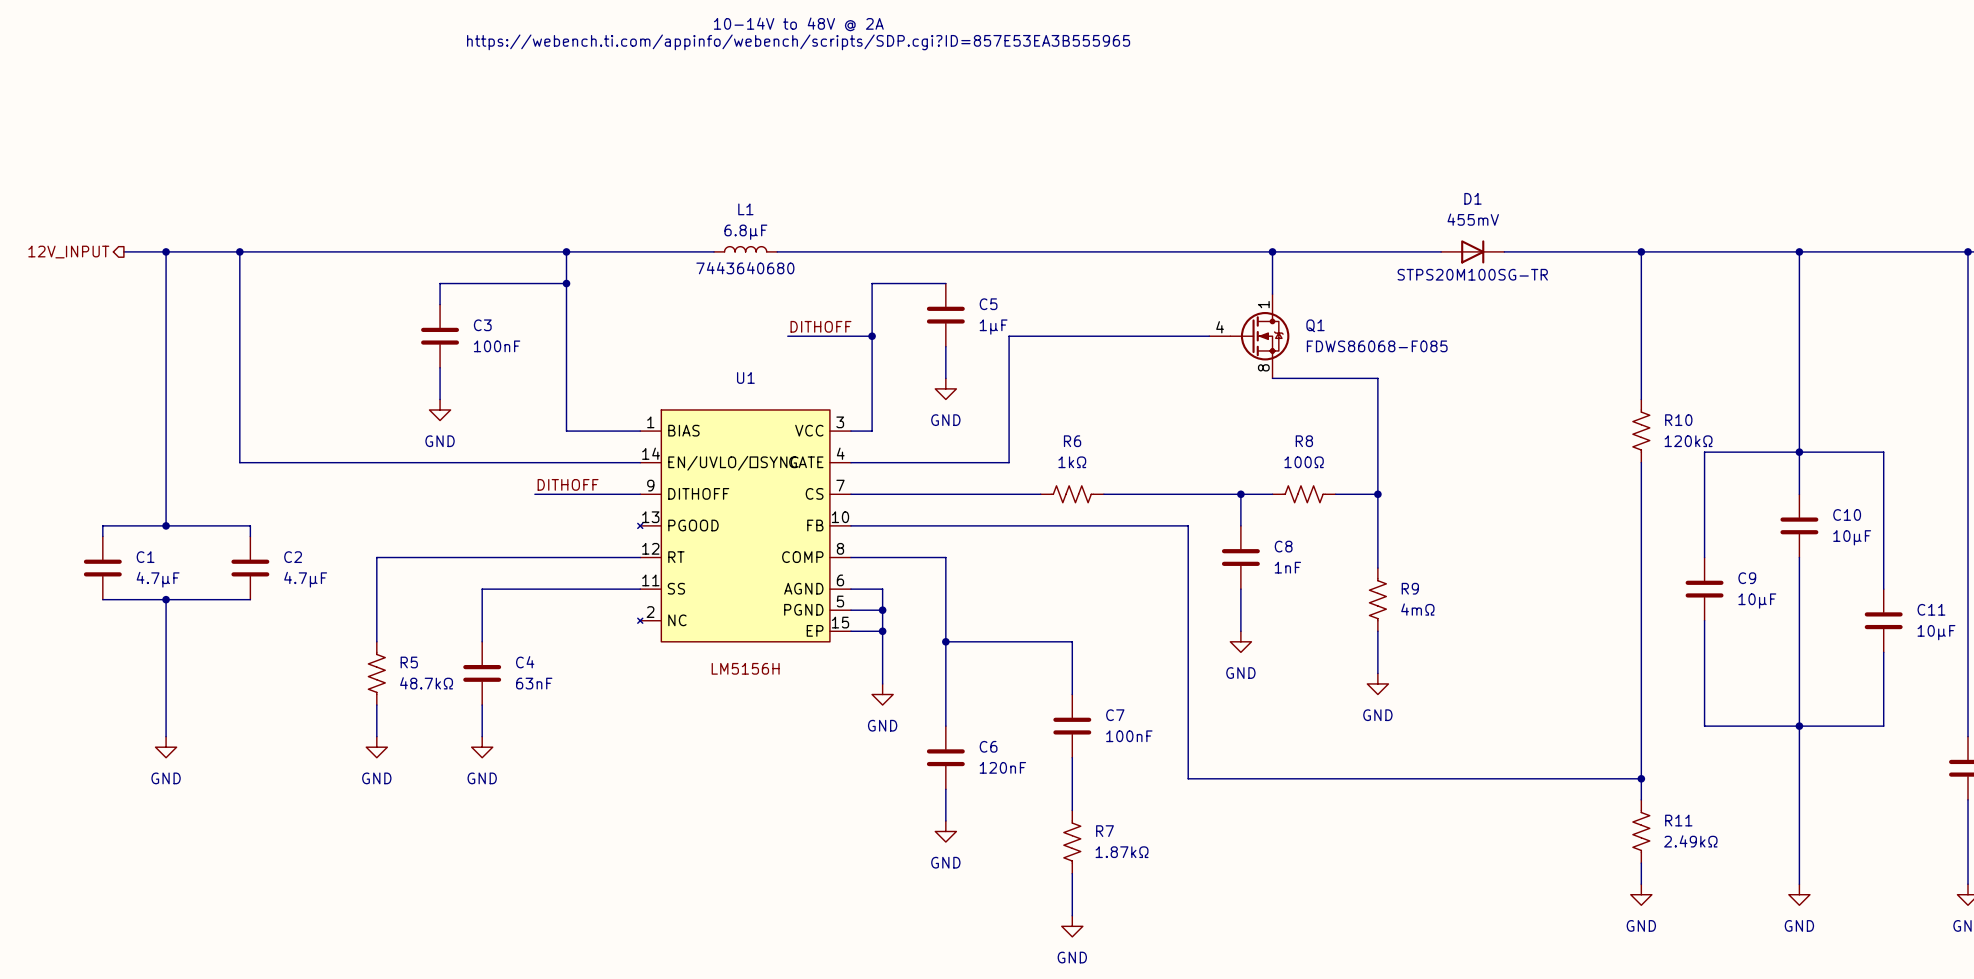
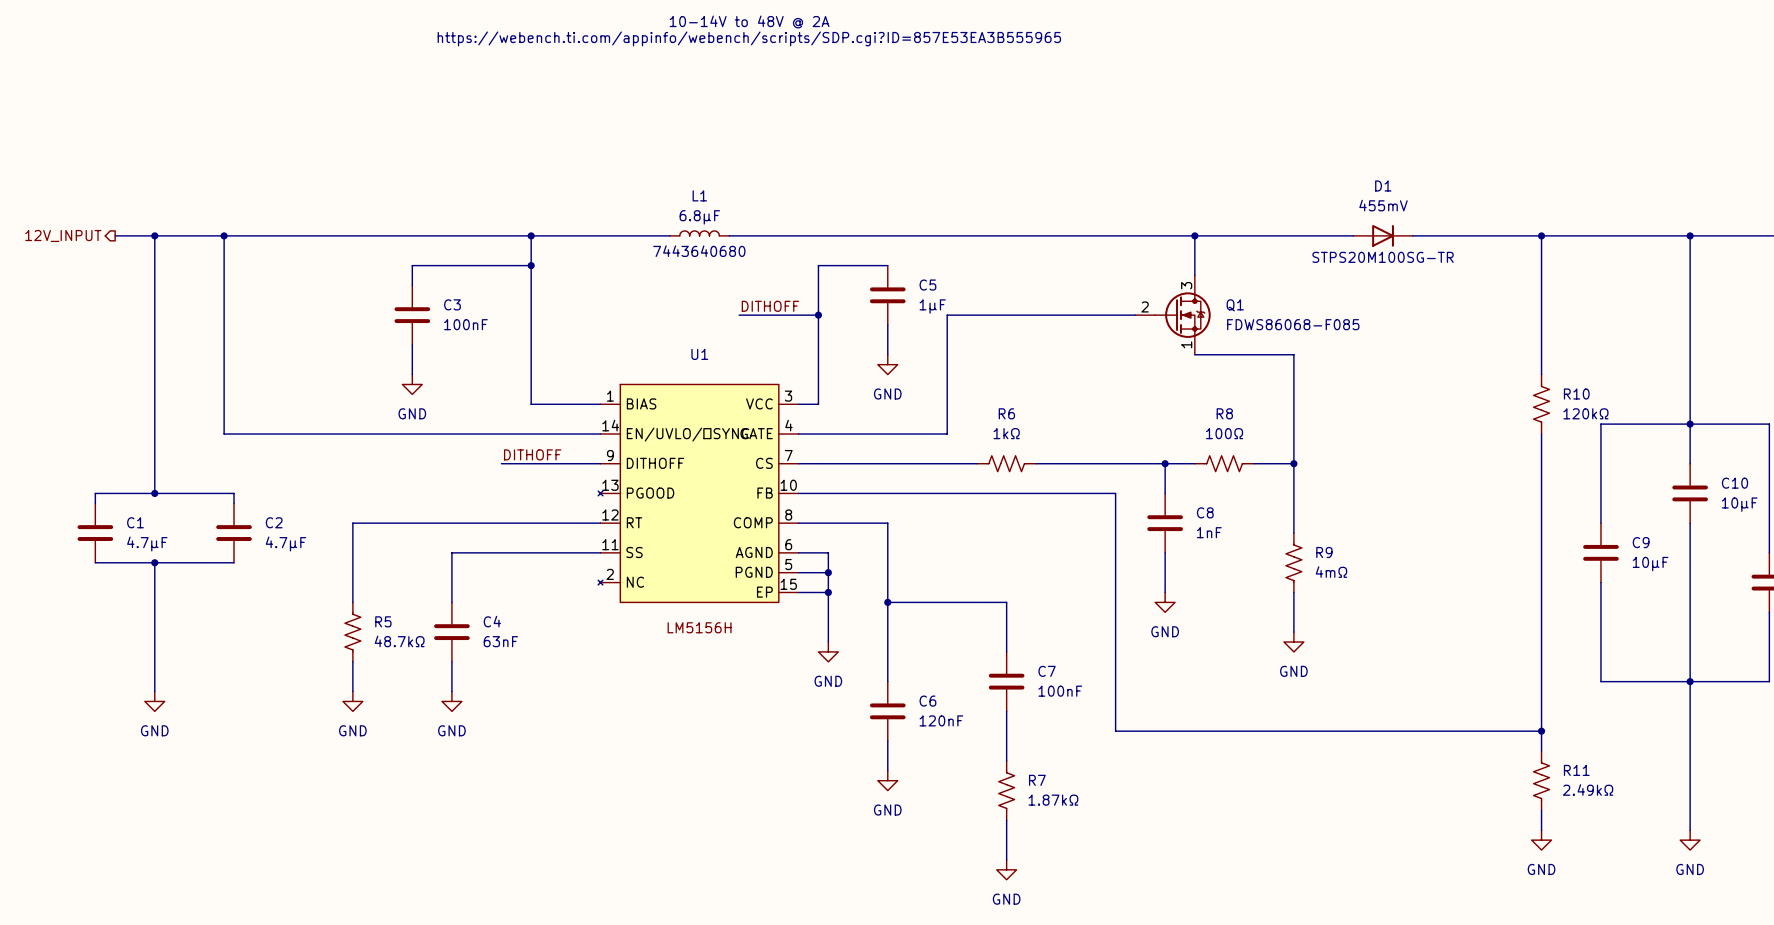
Q1 pin number: 1 (1263, 304) -> 3 (1186, 285)
Q1 pin number: 4 (1220, 327) -> 2 (1145, 306)
Q1 pin number: 8 (1263, 367) -> 1 (1186, 344)

